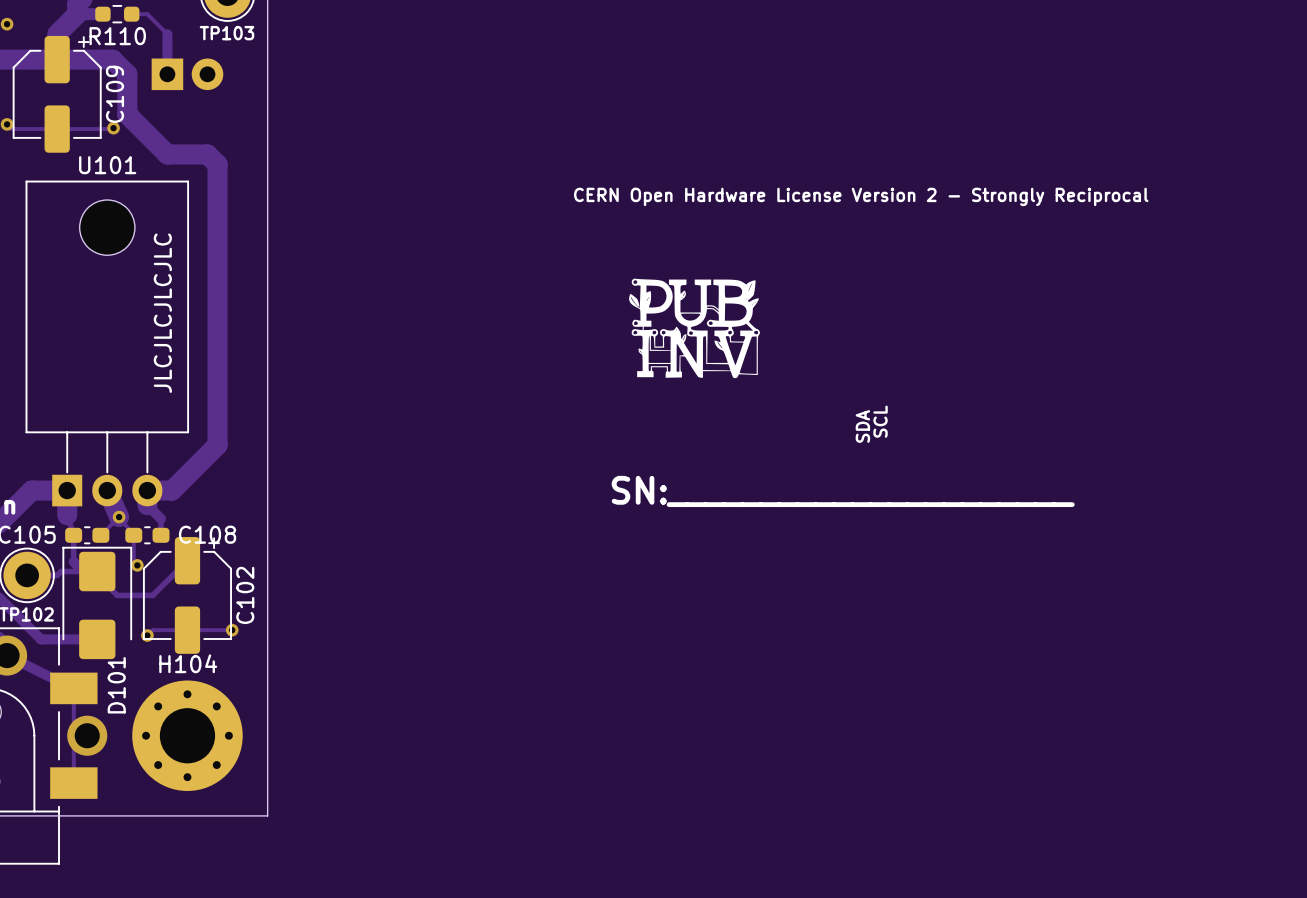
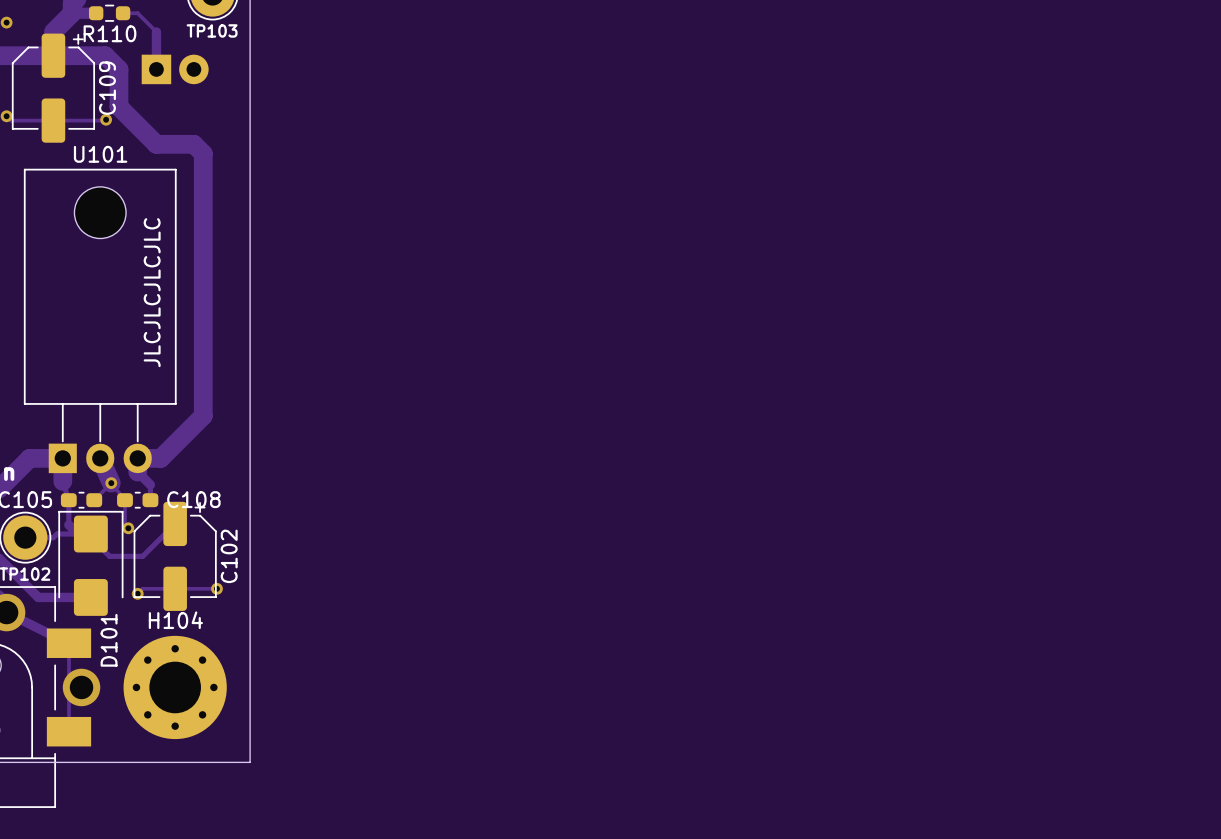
text: CERN Open Hardware License Version 2 - Strongly Reciprocal (861, 196) -> none
drawing: [629, 278, 760, 379] -> none
text: SCL (880, 421) -> none
text: SDA (862, 426) -> none
text: SN:______________________ (843, 491) -> none

